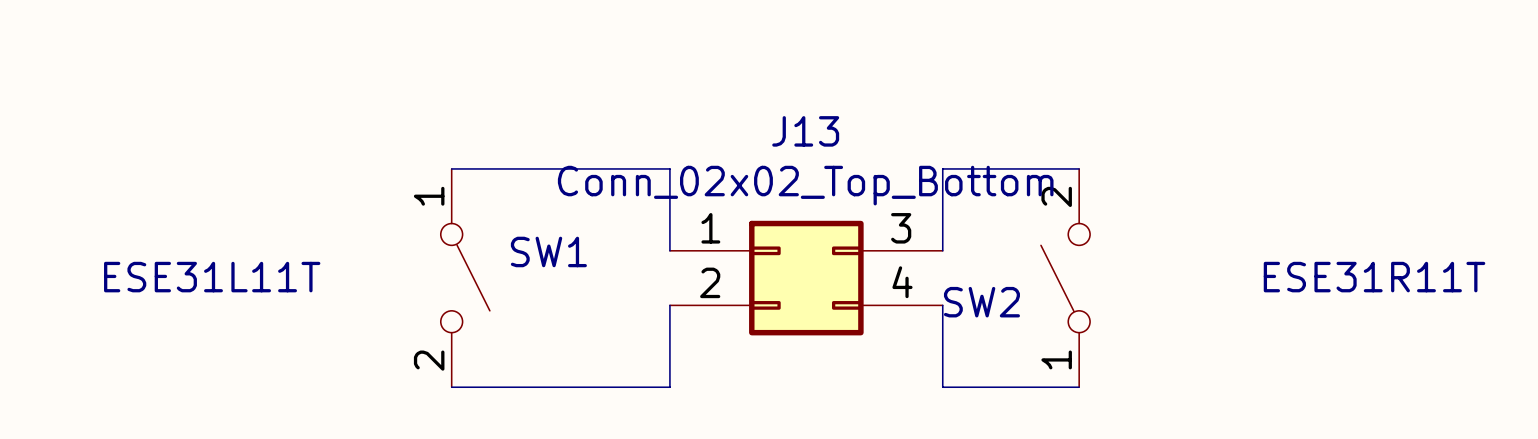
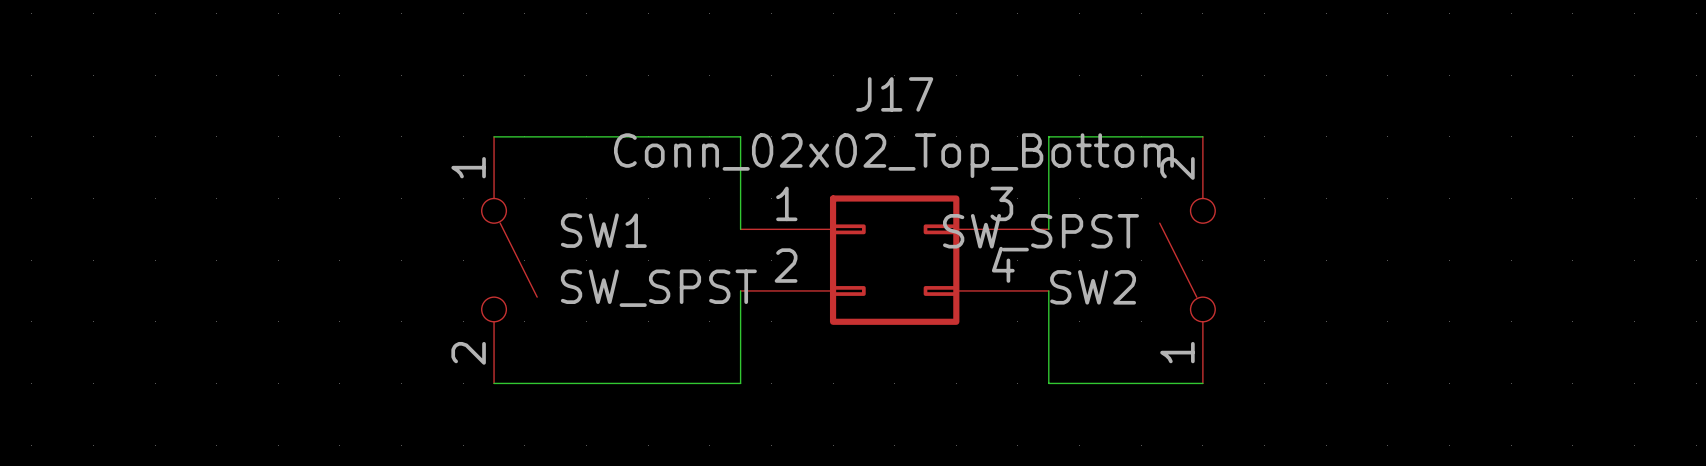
J13 name: J13 (805, 131) -> J17 (894, 94)
SW1 value: ESE31L11T (212, 277) -> SW_SPST (658, 288)
SW2 value: ESE31R11T (1374, 277) -> SW_SPST (1040, 232)

